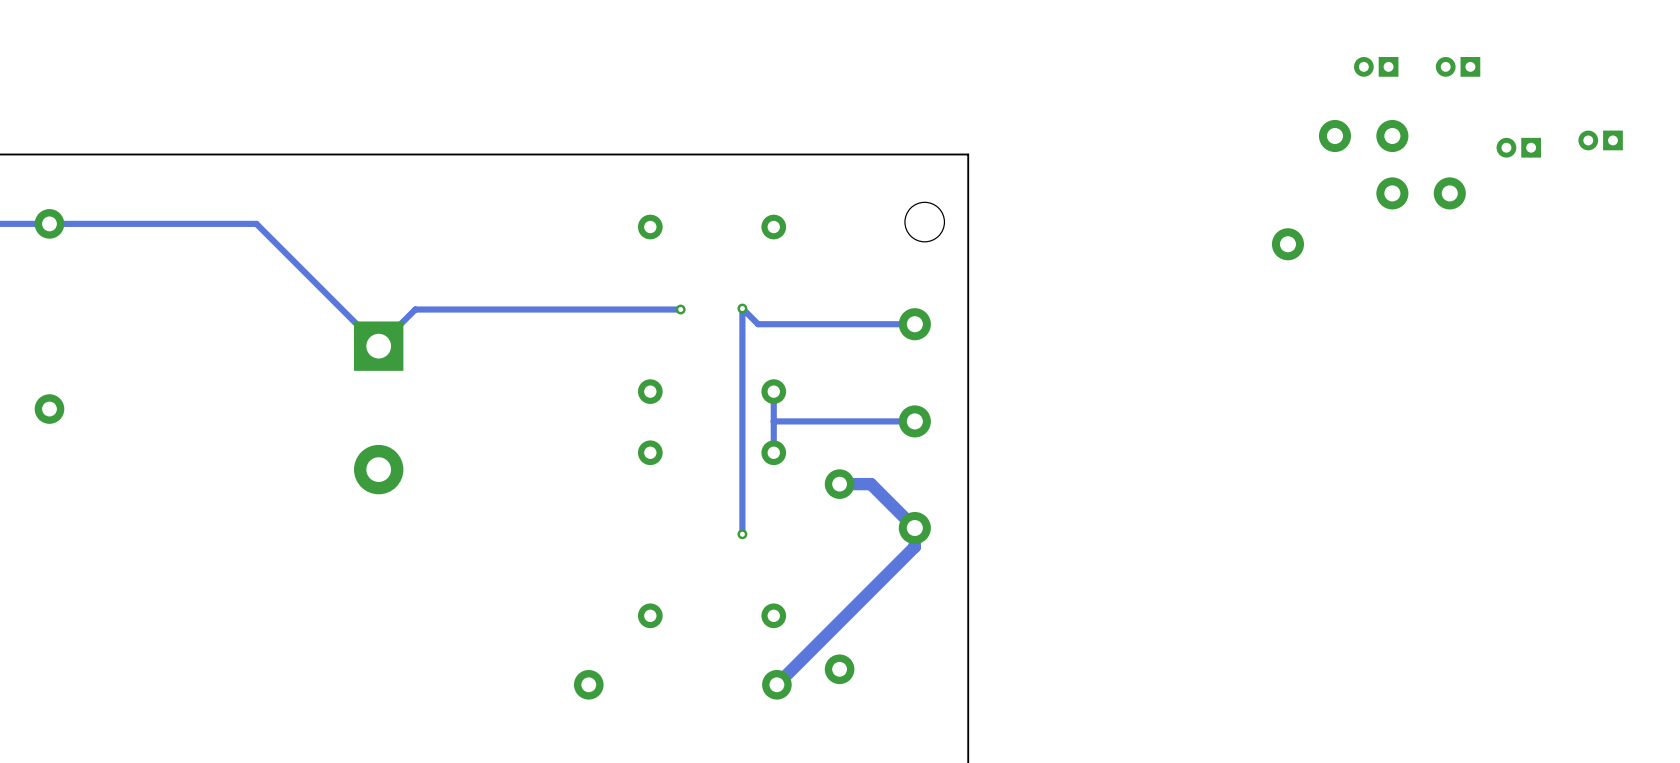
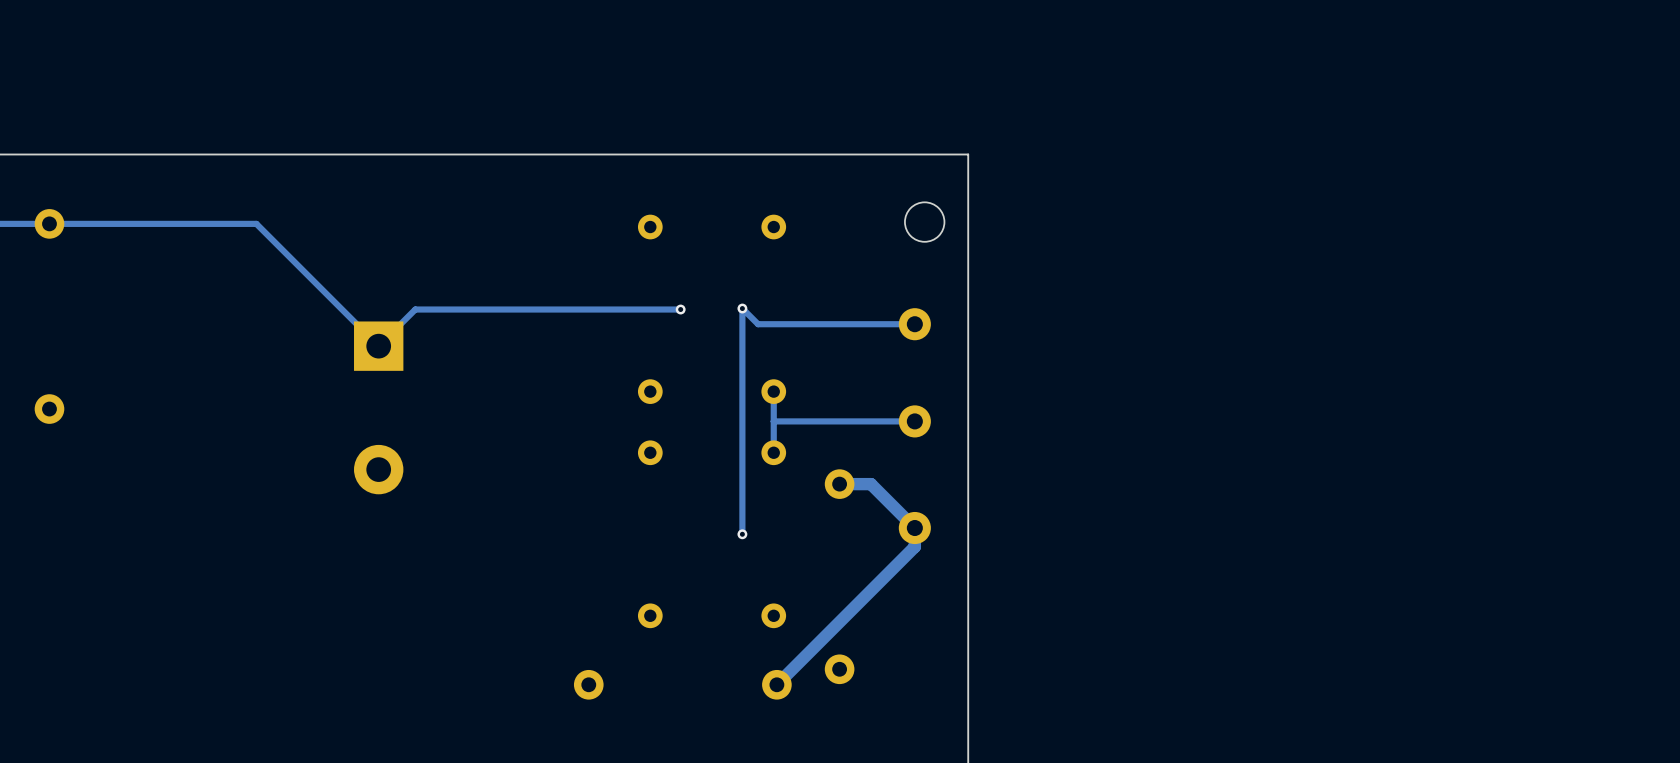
part: (1376, 66) -> none
part: (1458, 66) -> none
part: (1334, 136) -> none
part: (1392, 136) -> none
part: (1600, 140) -> none
part: (1518, 147) -> none
part: (1392, 193) -> none
part: (1449, 193) -> none
part: (1287, 244) -> none

